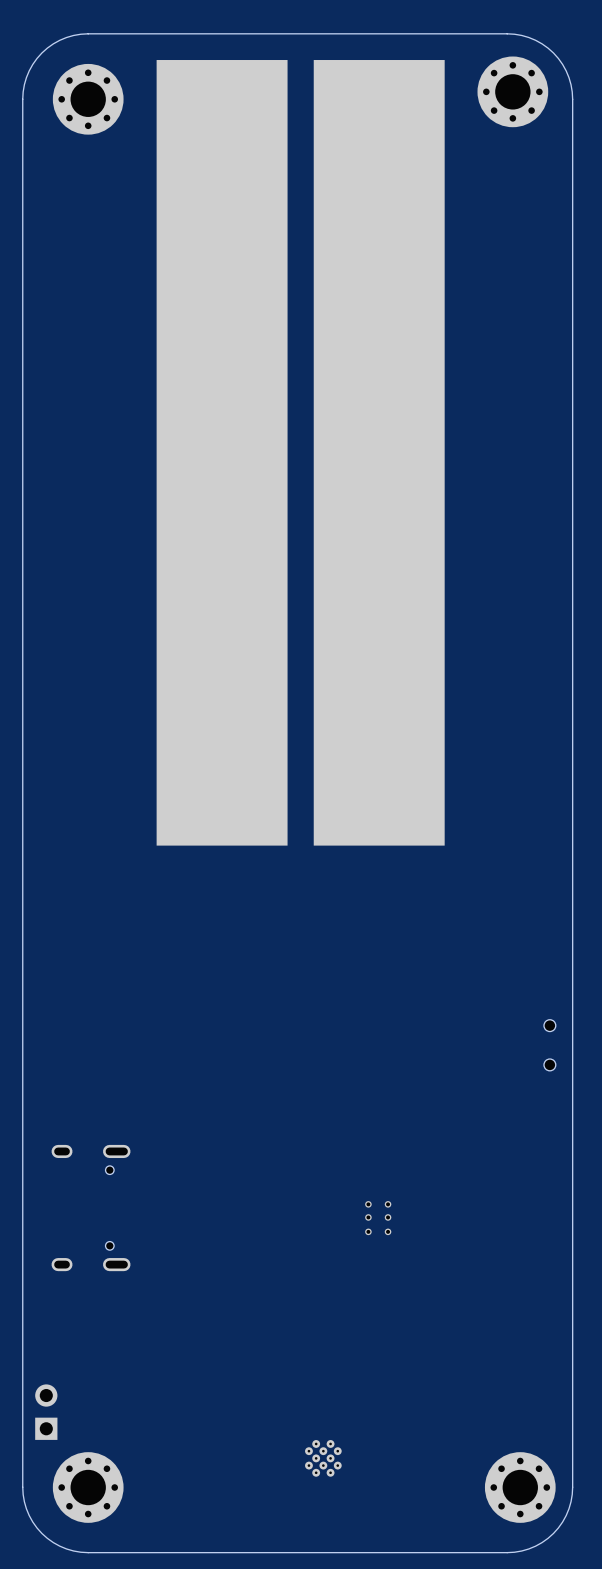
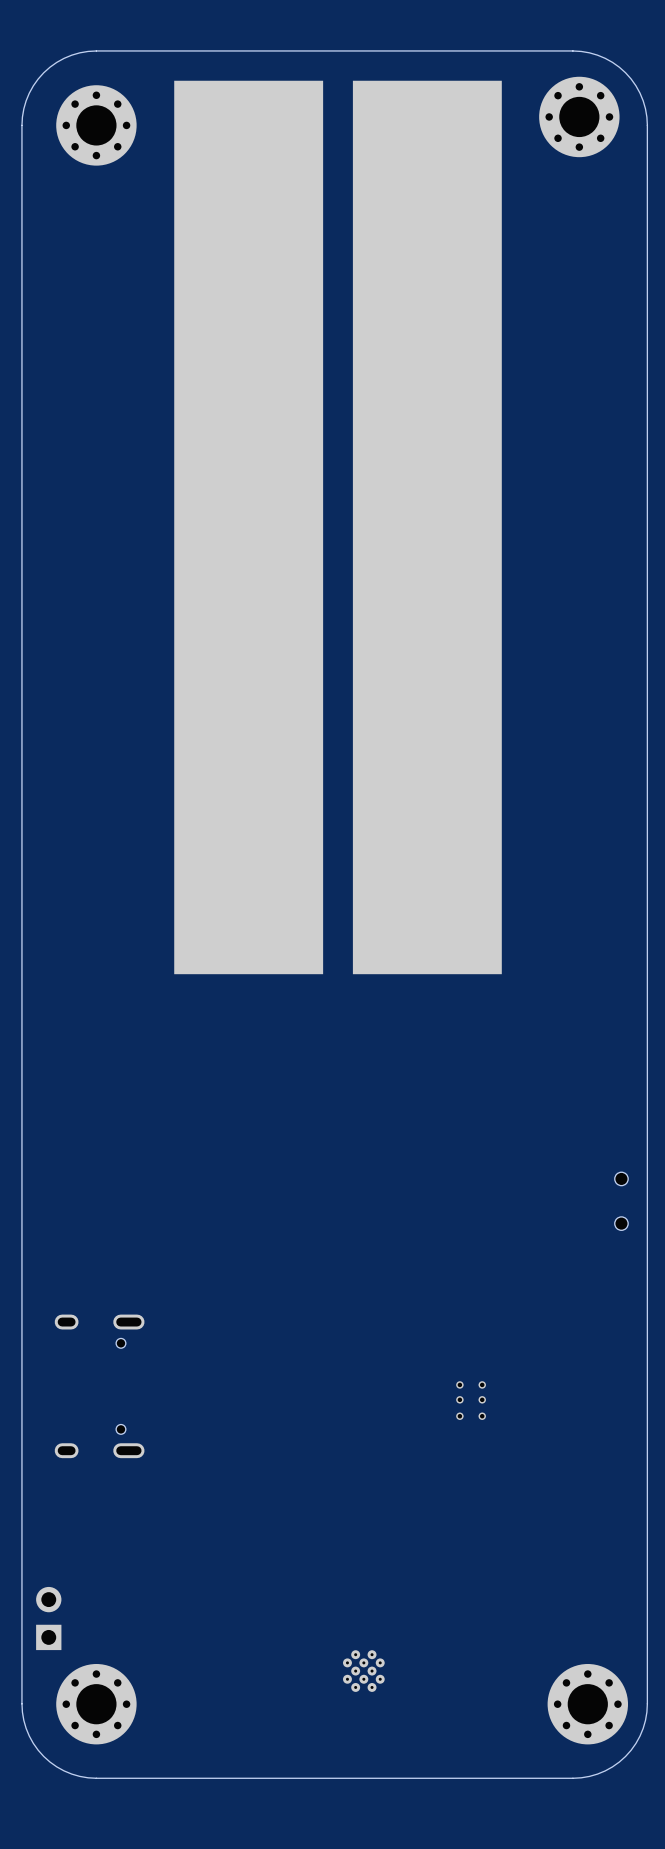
part position: (378, 1218) -> (471, 1400)

